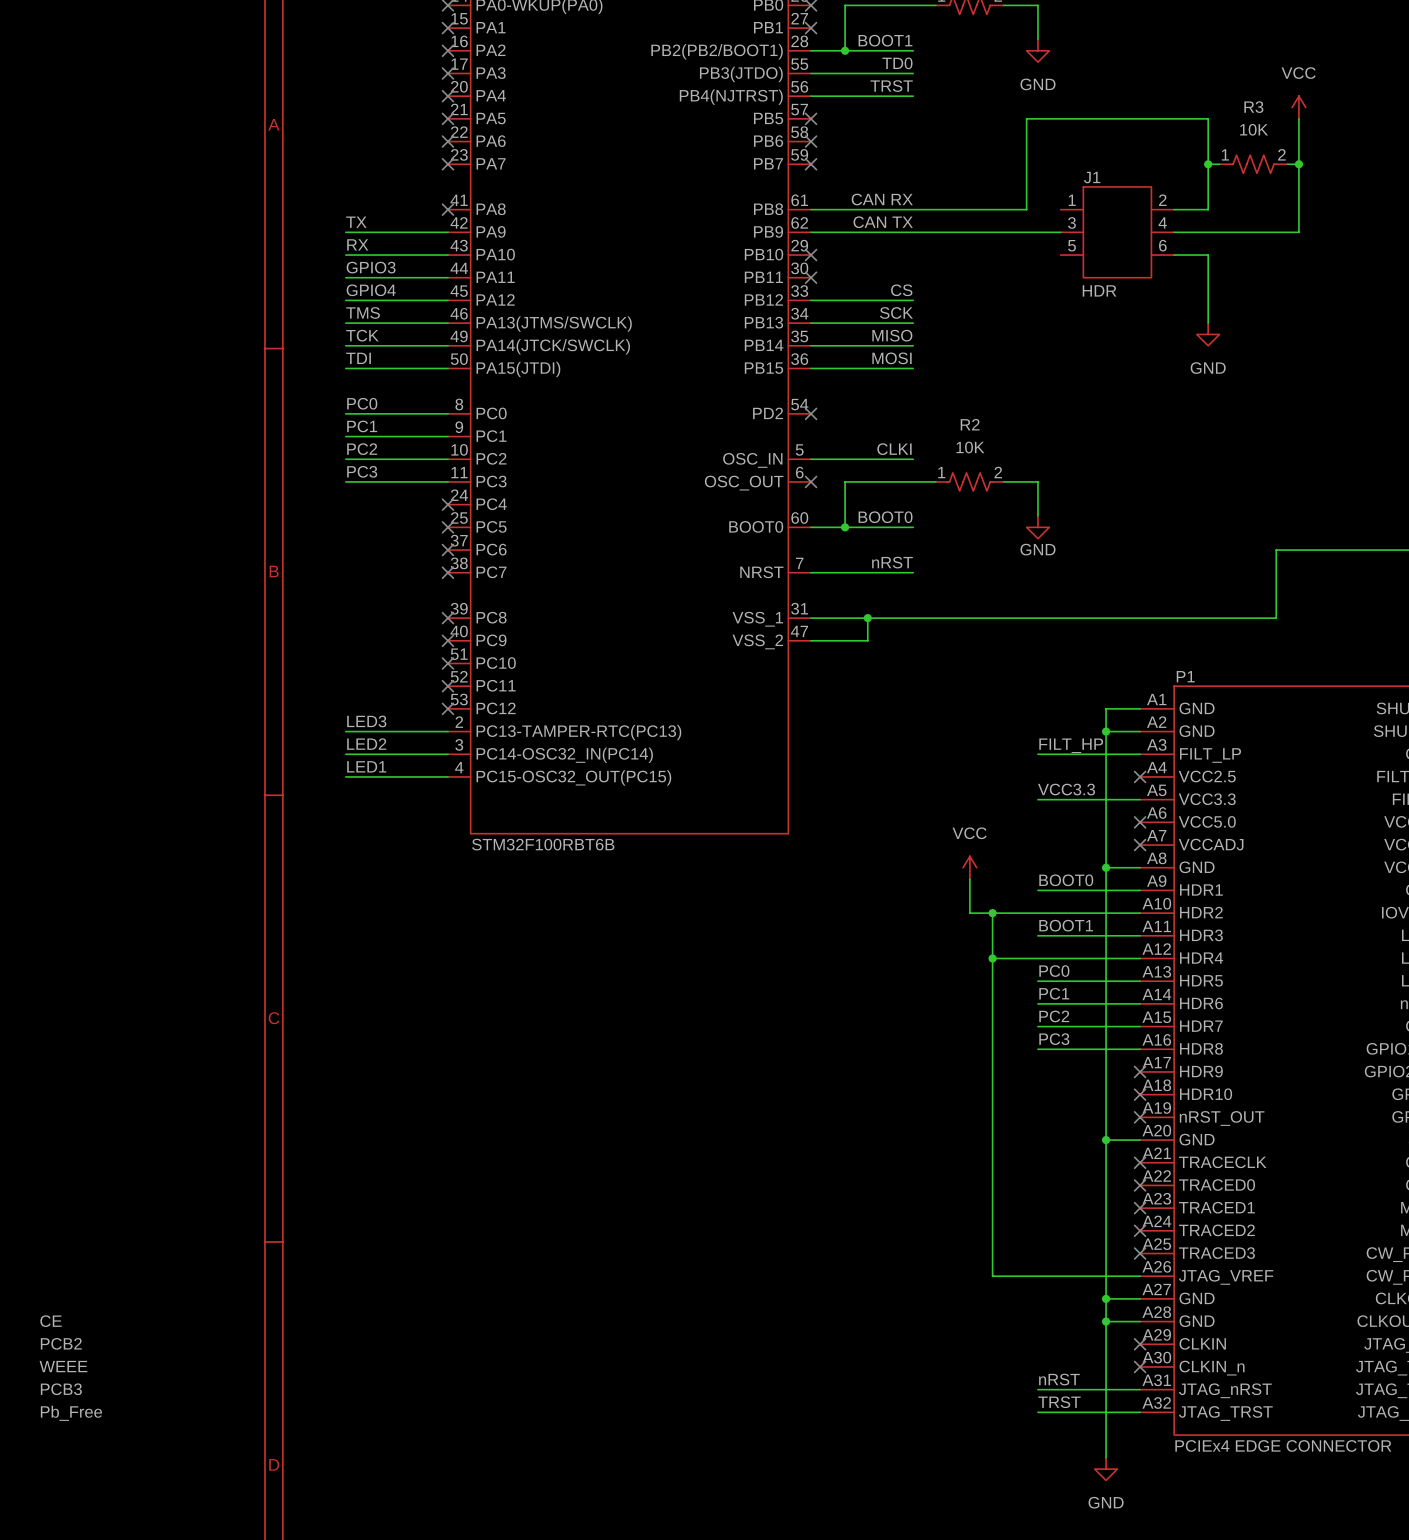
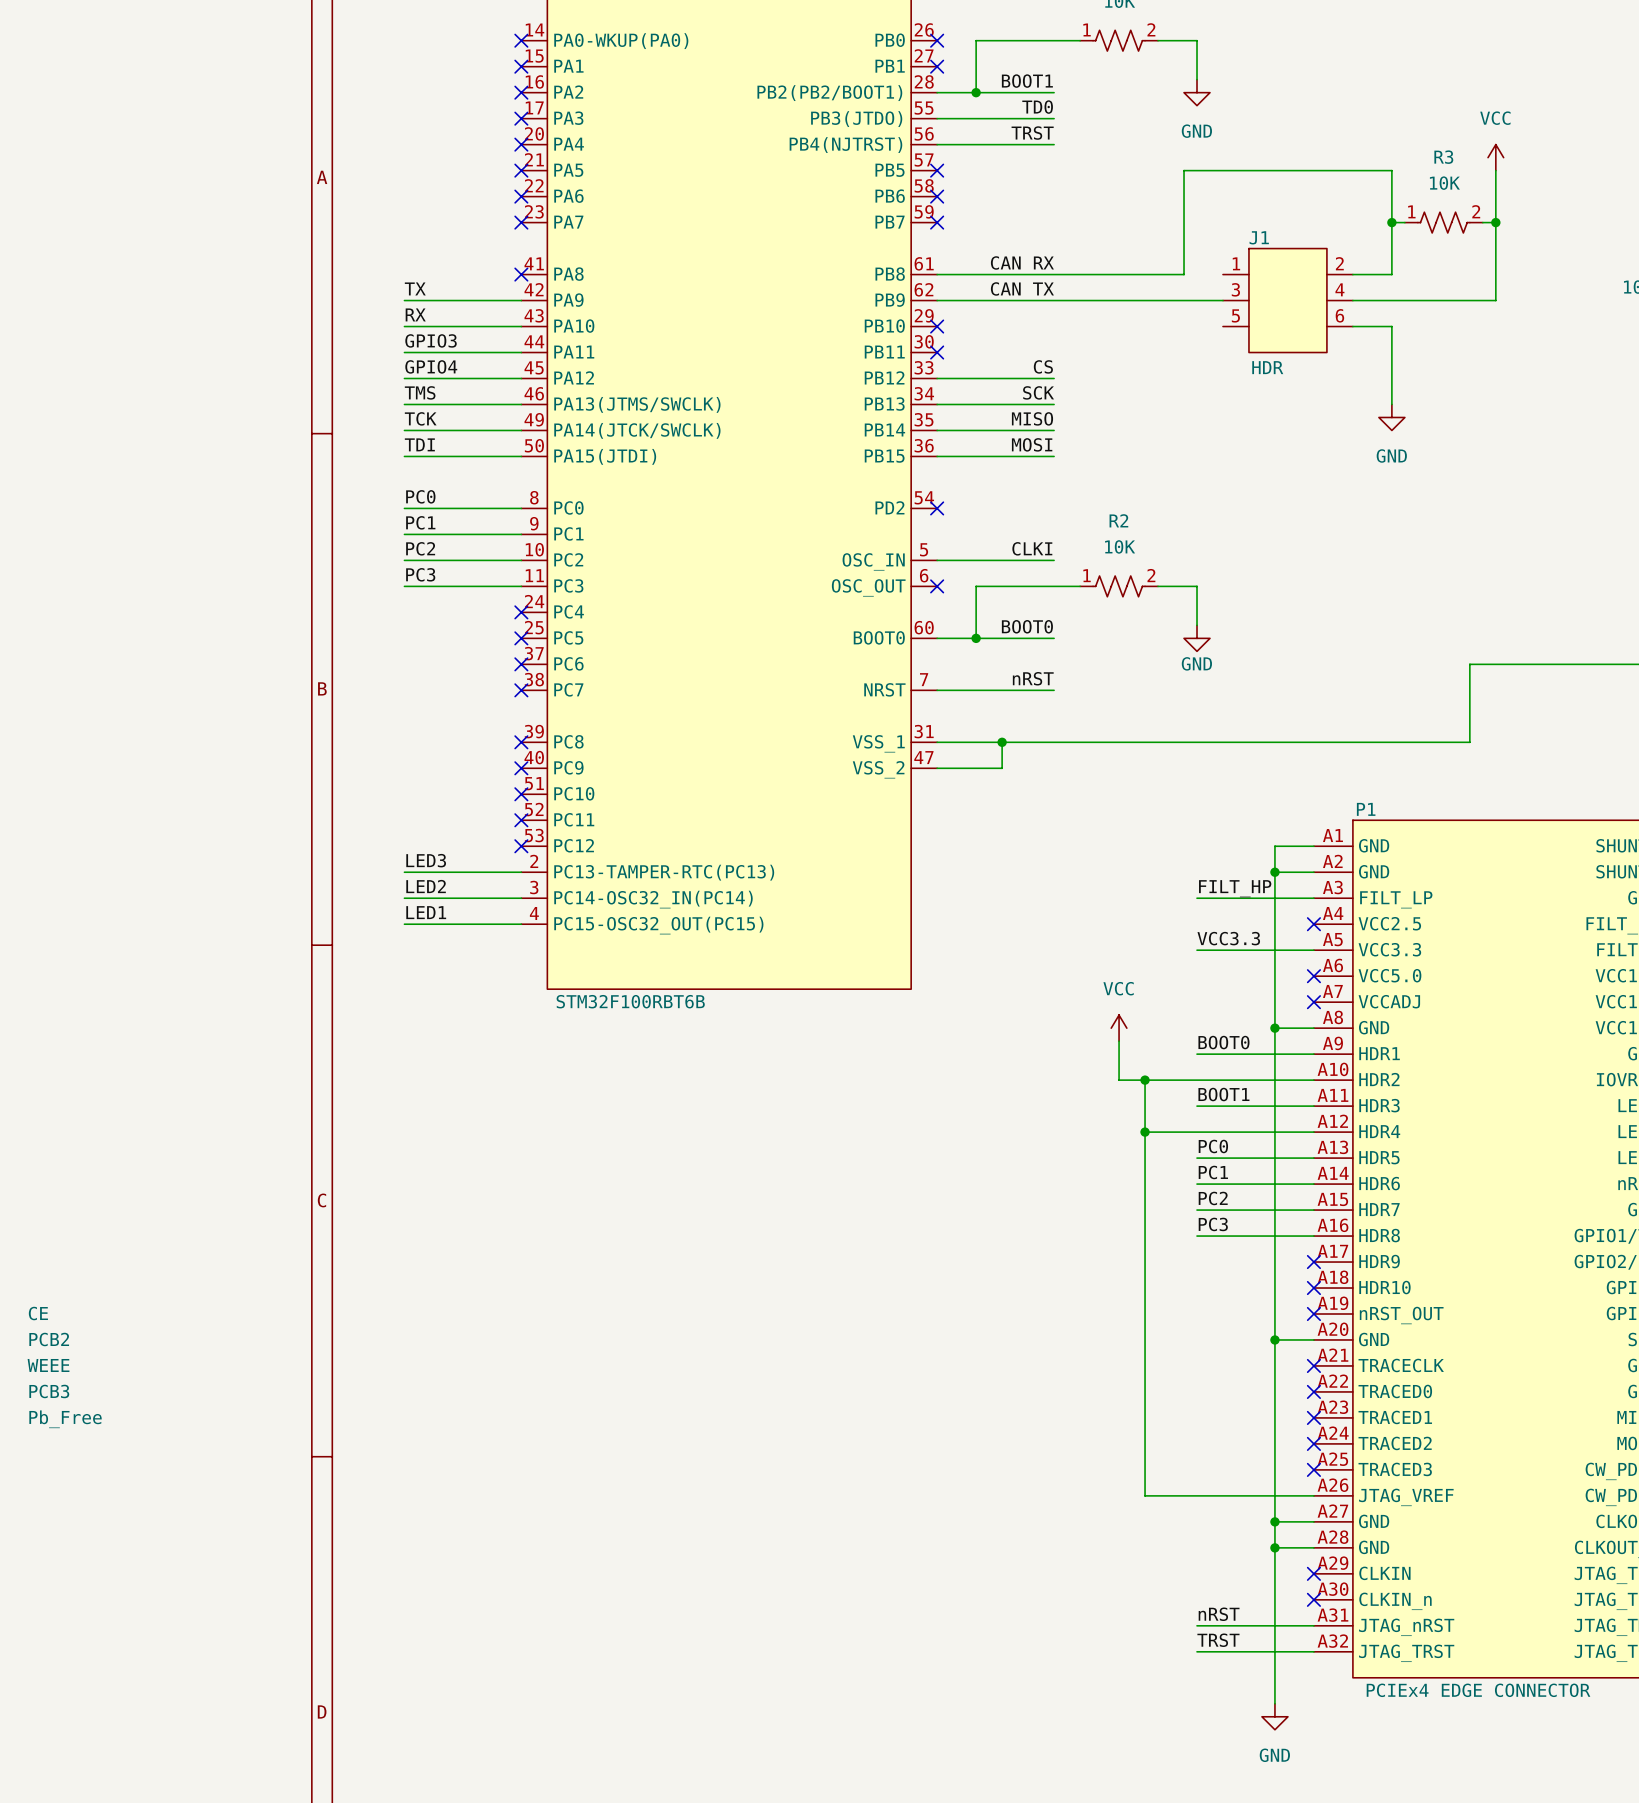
part position: (51, 1321) -> (38, 1313)
PCB2 position: (63, 1355) -> (48, 1352)
PCB3 position: (71, 1402) -> (65, 1406)

